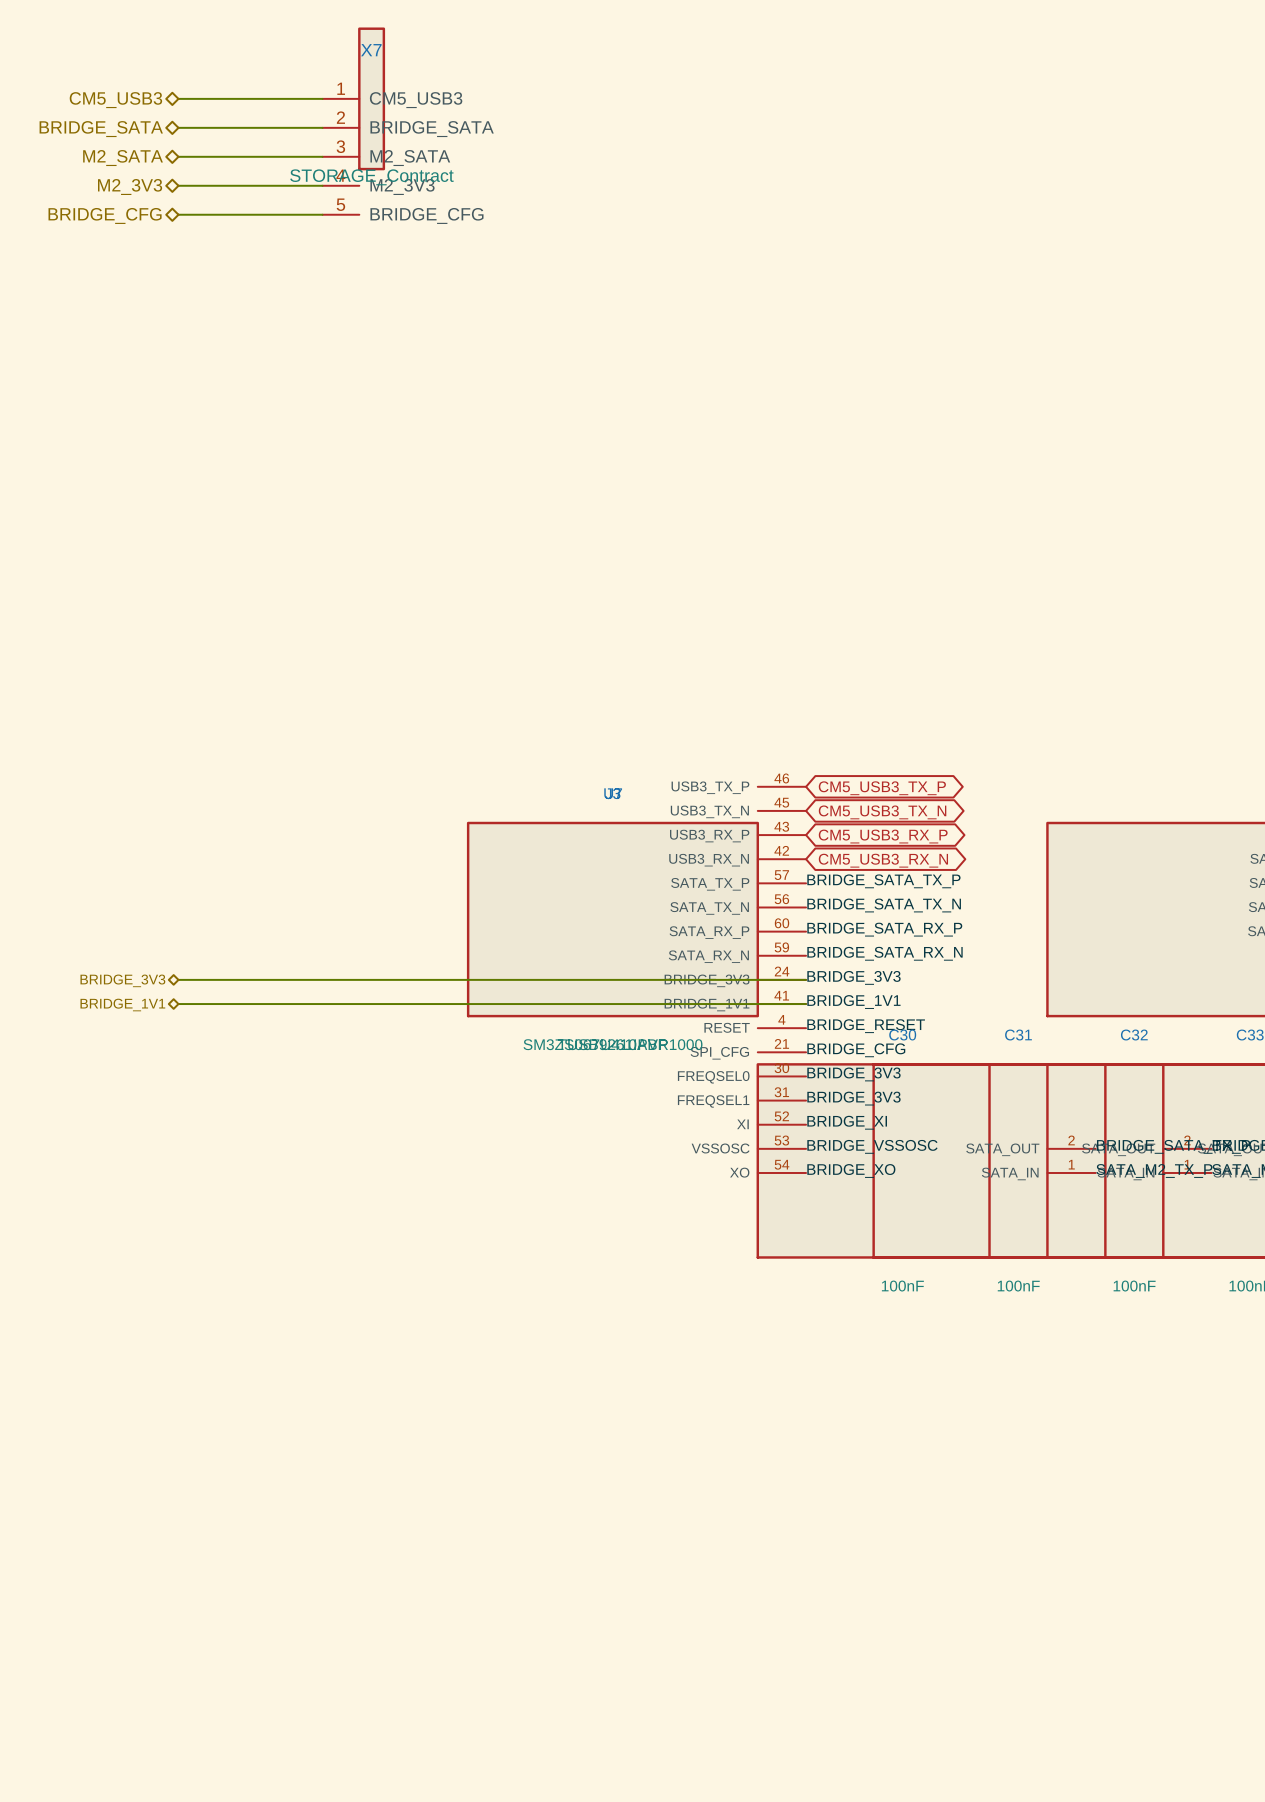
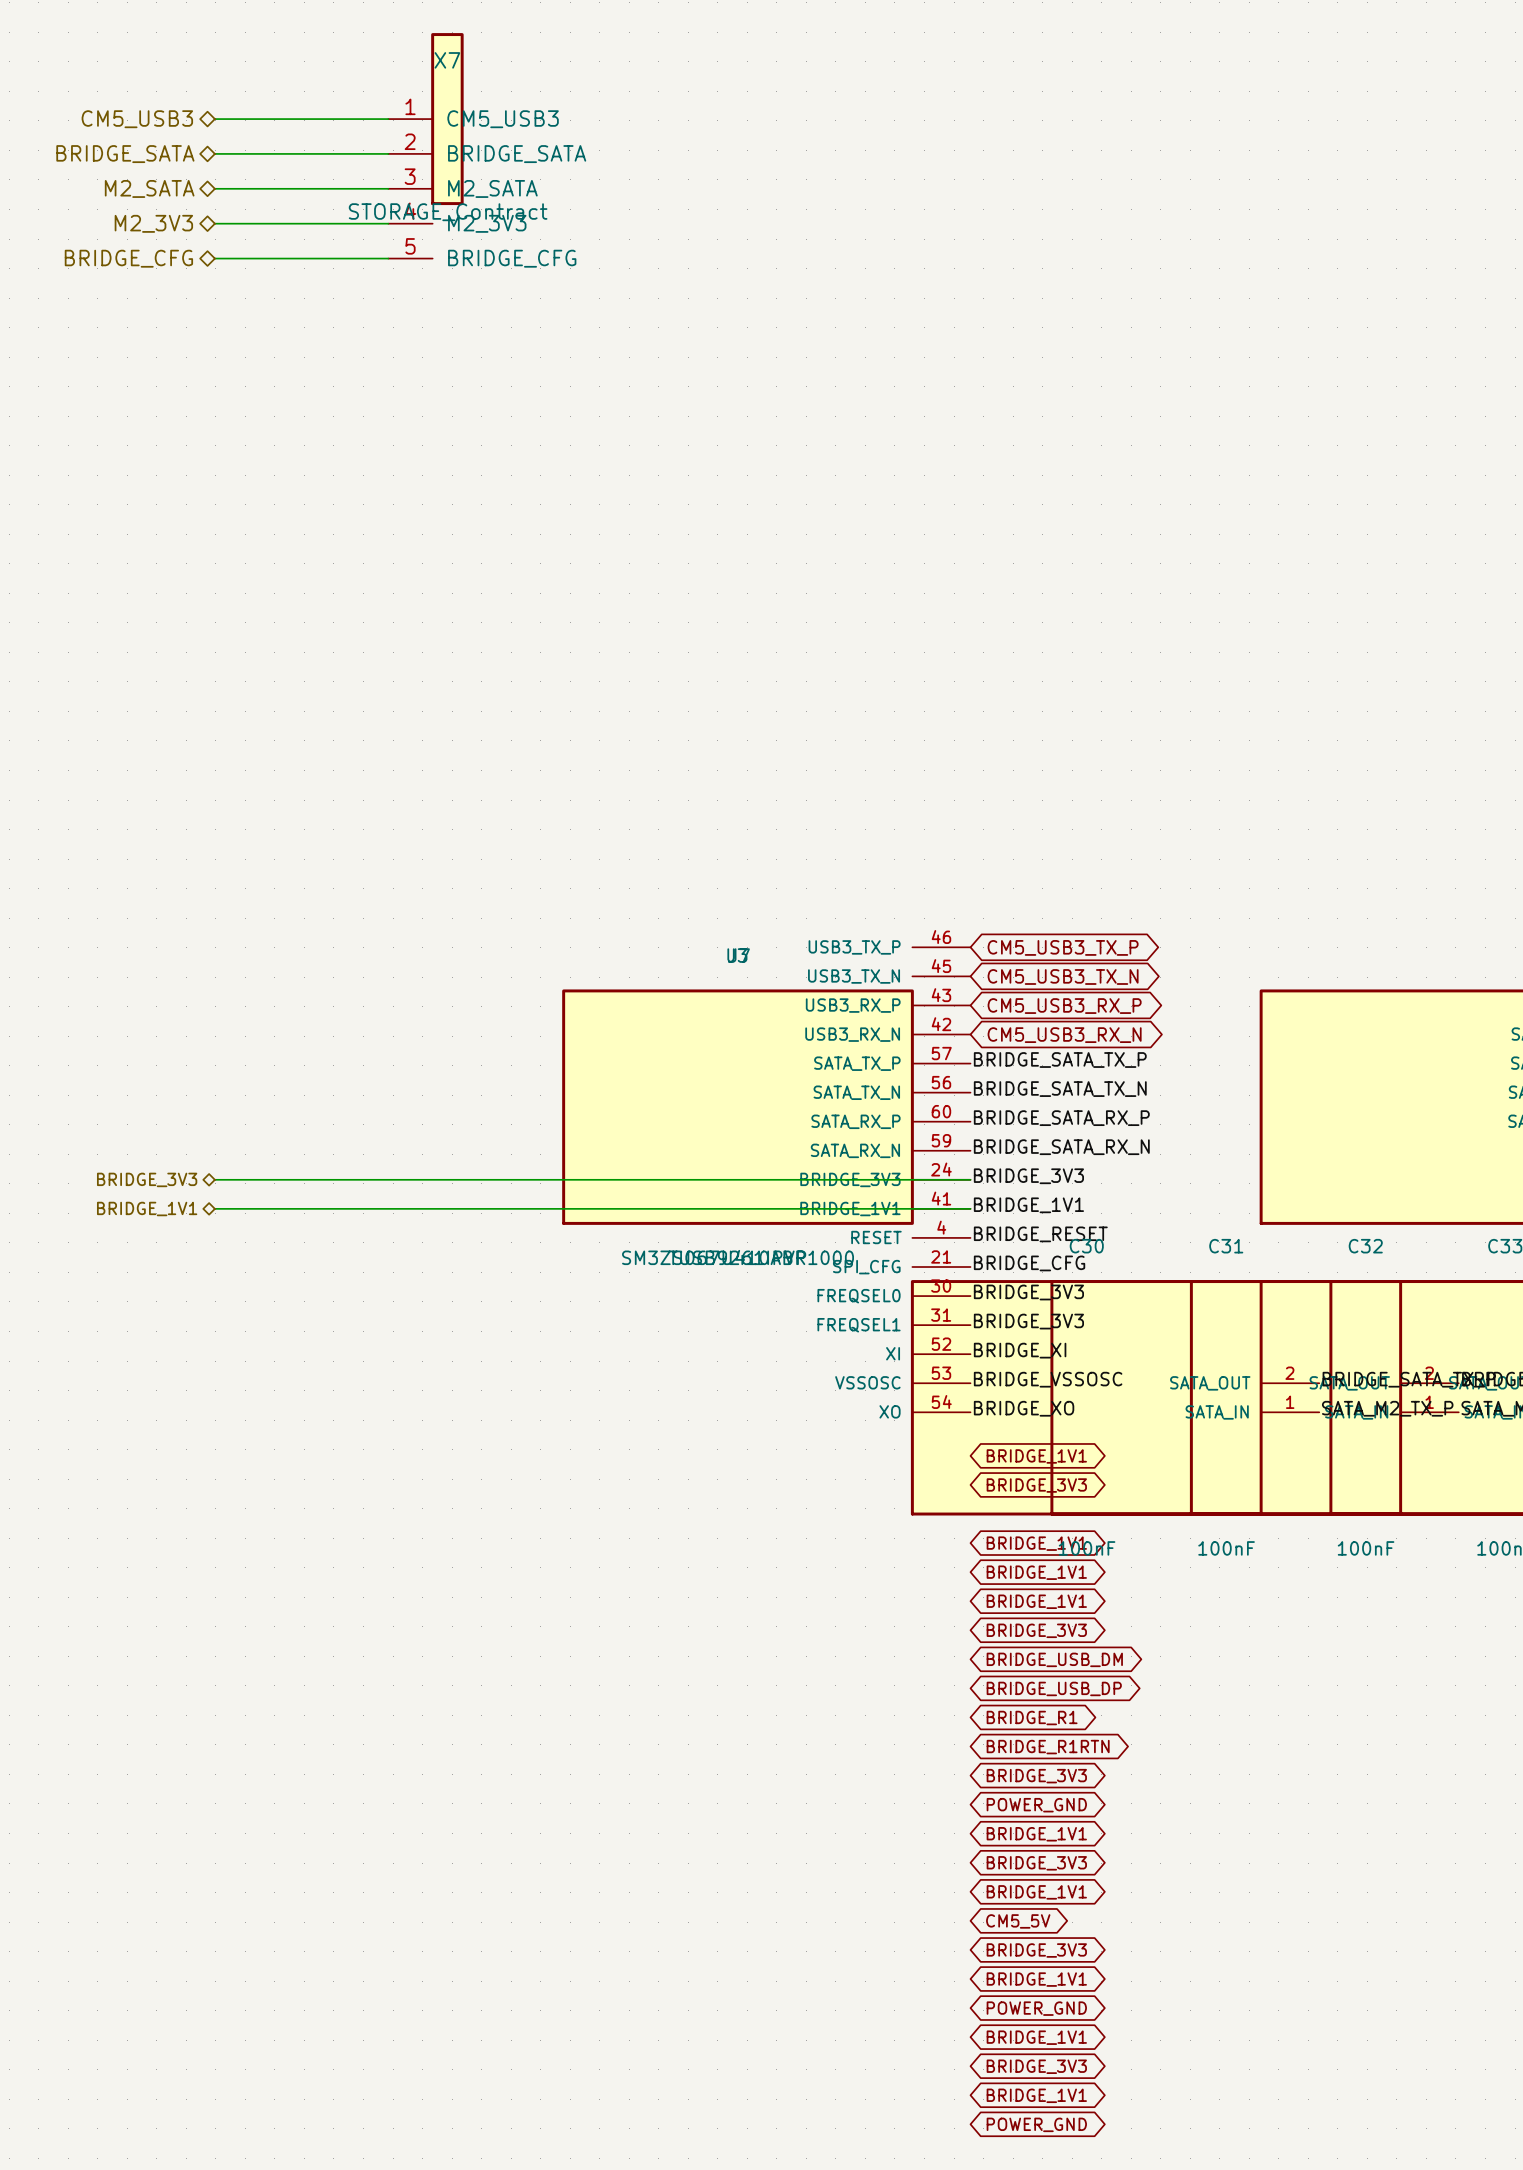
global label: none -> BRIDGE_1V1 (1036, 1456)
global label: none -> BRIDGE_3V3 (1036, 1485)
global label: none -> BRIDGE_1V1 (1036, 1543)
global label: none -> BRIDGE_1V1 (1036, 1572)
global label: none -> BRIDGE_1V1 (1036, 1601)
global label: none -> BRIDGE_3V3 (1036, 1630)
global label: none -> BRIDGE_USB_DM (1054, 1659)
global label: none -> BRIDGE_USB_DP (1054, 1688)
global label: none -> BRIDGE_R1 (1032, 1718)
global label: none -> BRIDGE_R1RTN (1048, 1747)
global label: none -> BRIDGE_3V3 (1036, 1776)
global label: none -> POWER_GND (1036, 1805)
global label: none -> BRIDGE_1V1 (1036, 1834)
global label: none -> BRIDGE_3V3 (1036, 1863)
global label: none -> BRIDGE_1V1 (1036, 1892)
global label: none -> CM5_5V (1018, 1921)
global label: none -> BRIDGE_3V3 (1036, 1950)
global label: none -> BRIDGE_1V1 (1036, 1979)
global label: none -> POWER_GND (1036, 2008)
global label: none -> BRIDGE_1V1 (1036, 2037)
global label: none -> BRIDGE_3V3 (1036, 2066)
global label: none -> BRIDGE_1V1 (1036, 2095)
global label: none -> POWER_GND (1036, 2124)

